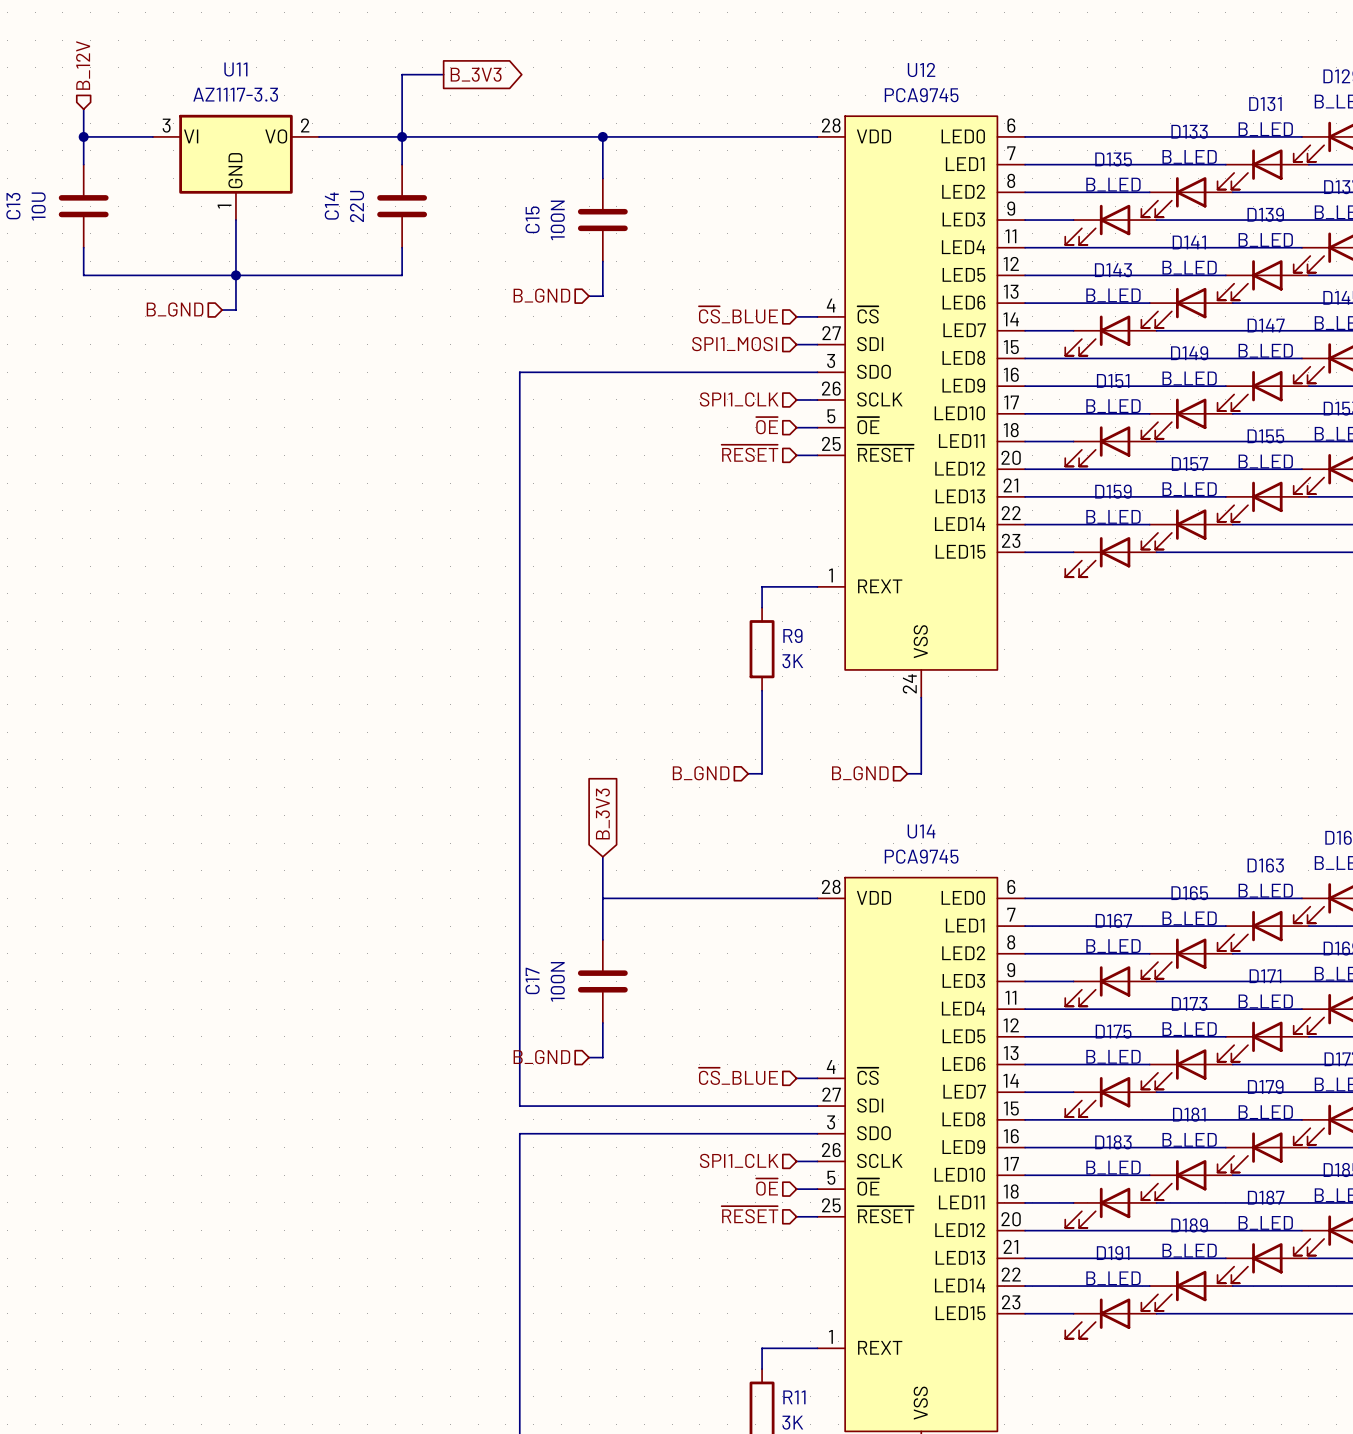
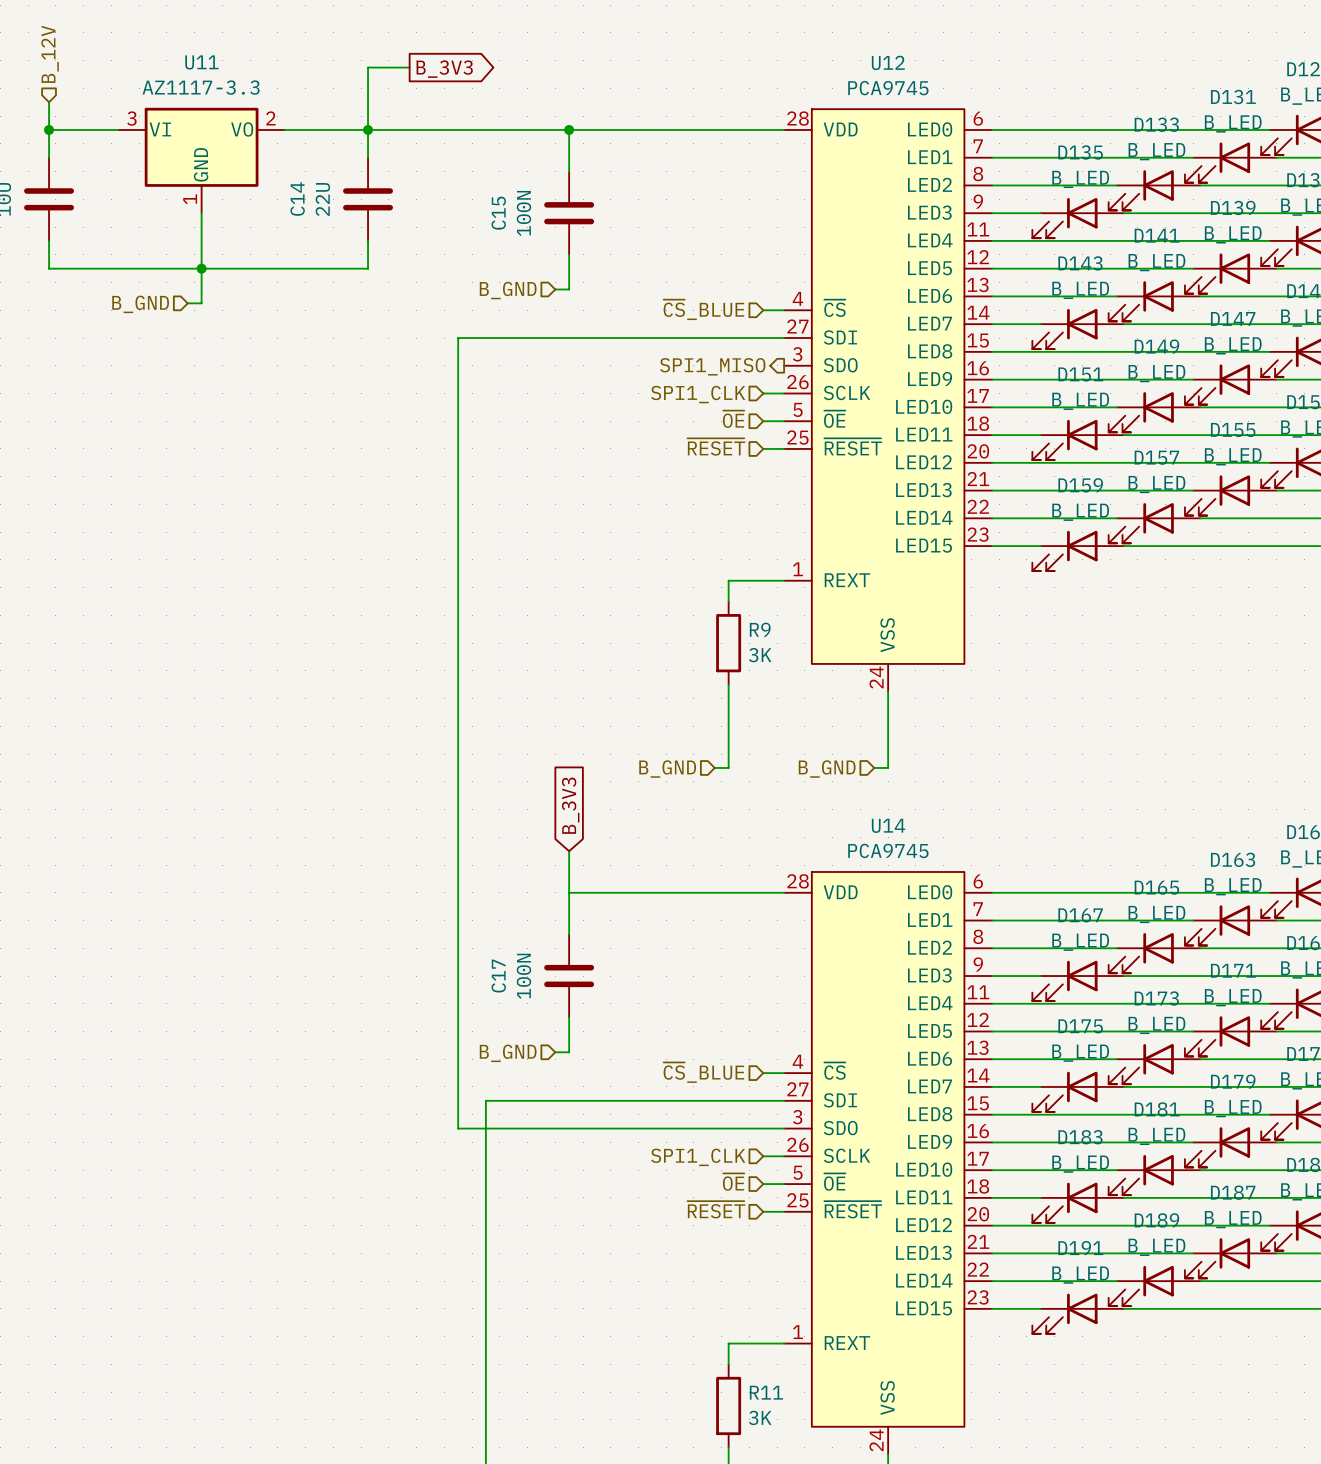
hierarchical label shape: input (734, 344) -> output (712, 366)
hierarchical label: SPI1_MOSI (734, 344) -> SPI1_MISO (712, 366)
wire: (817, 372) (519, 372) (519, 1106) -> (763, 338) (458, 338) (458, 1128) (485, 1128) (485, 1100)

